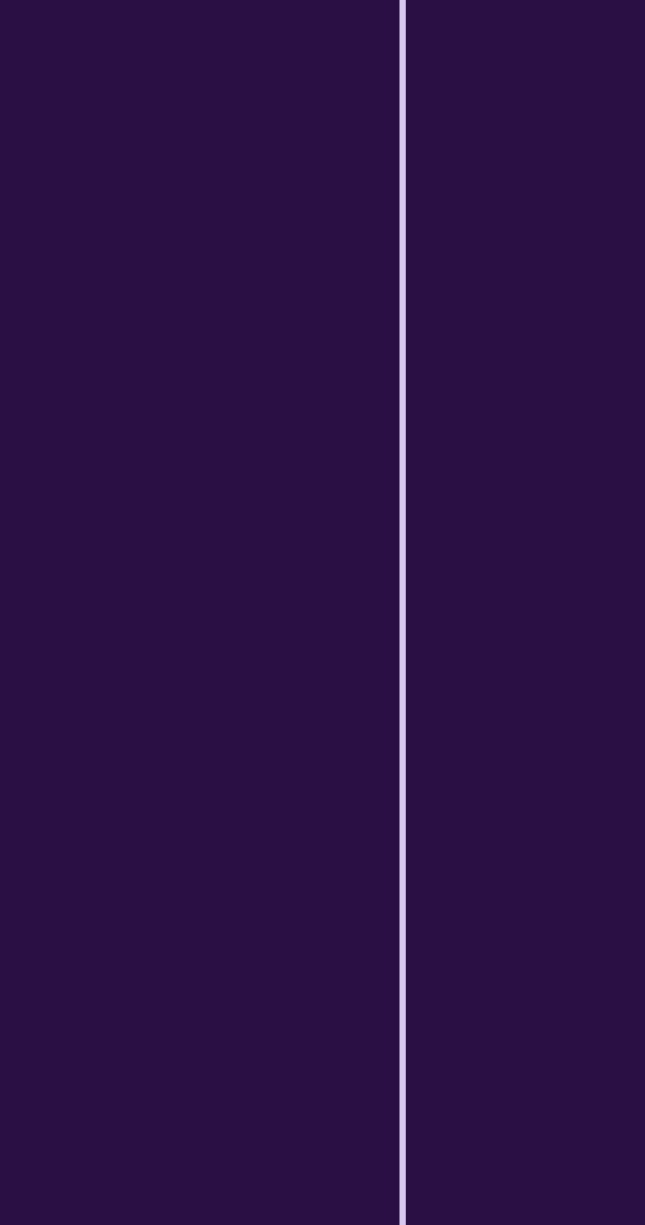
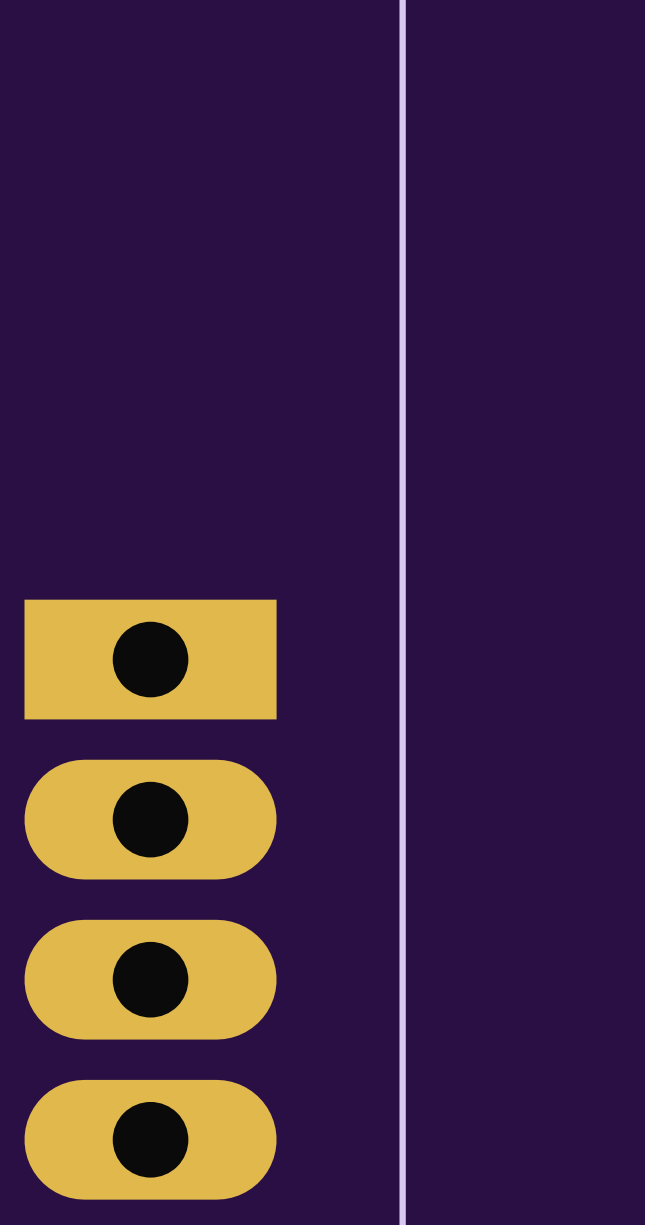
part: none -> (150, 899)

